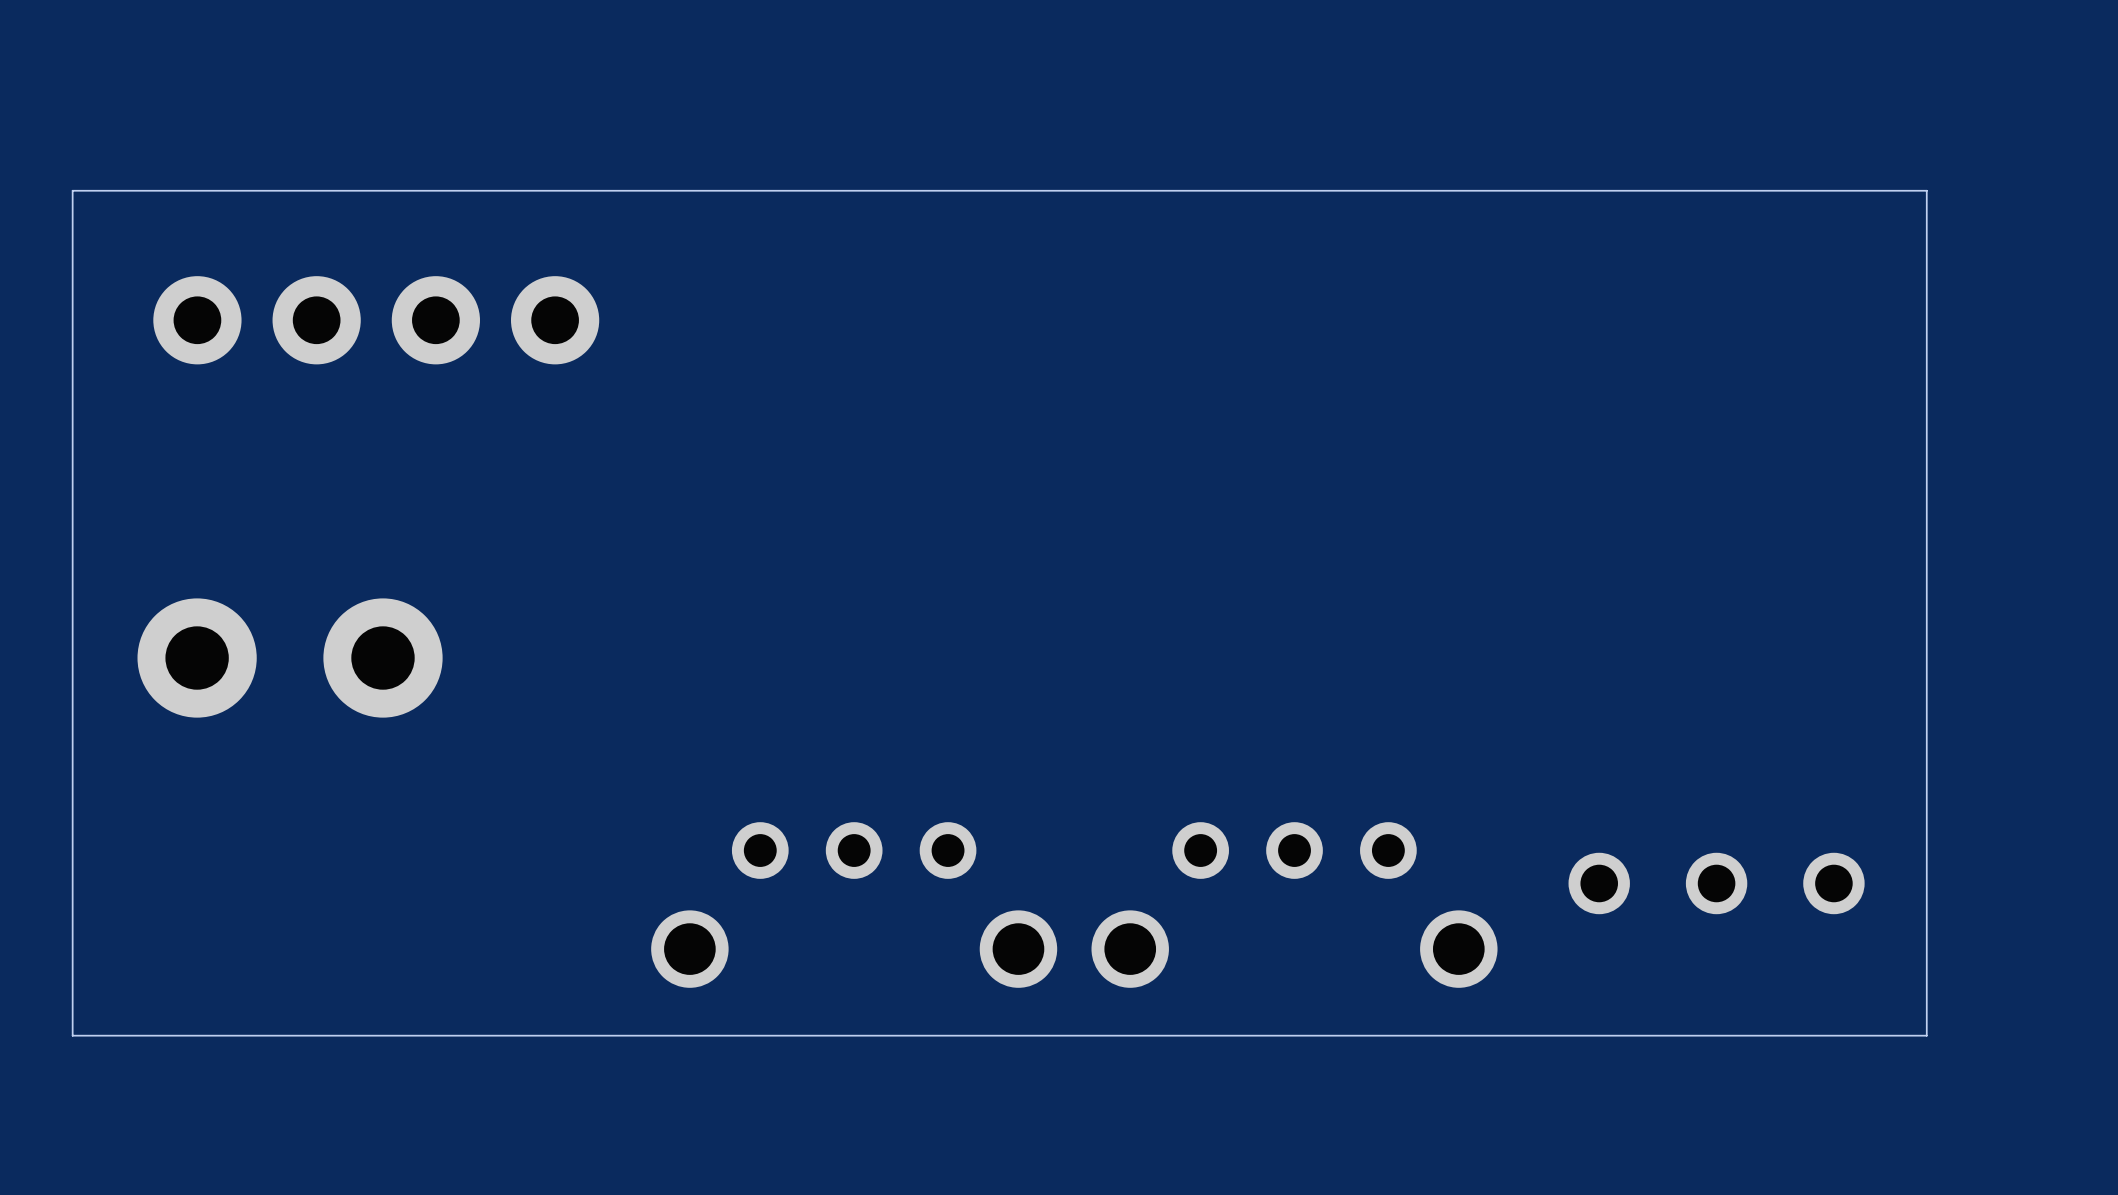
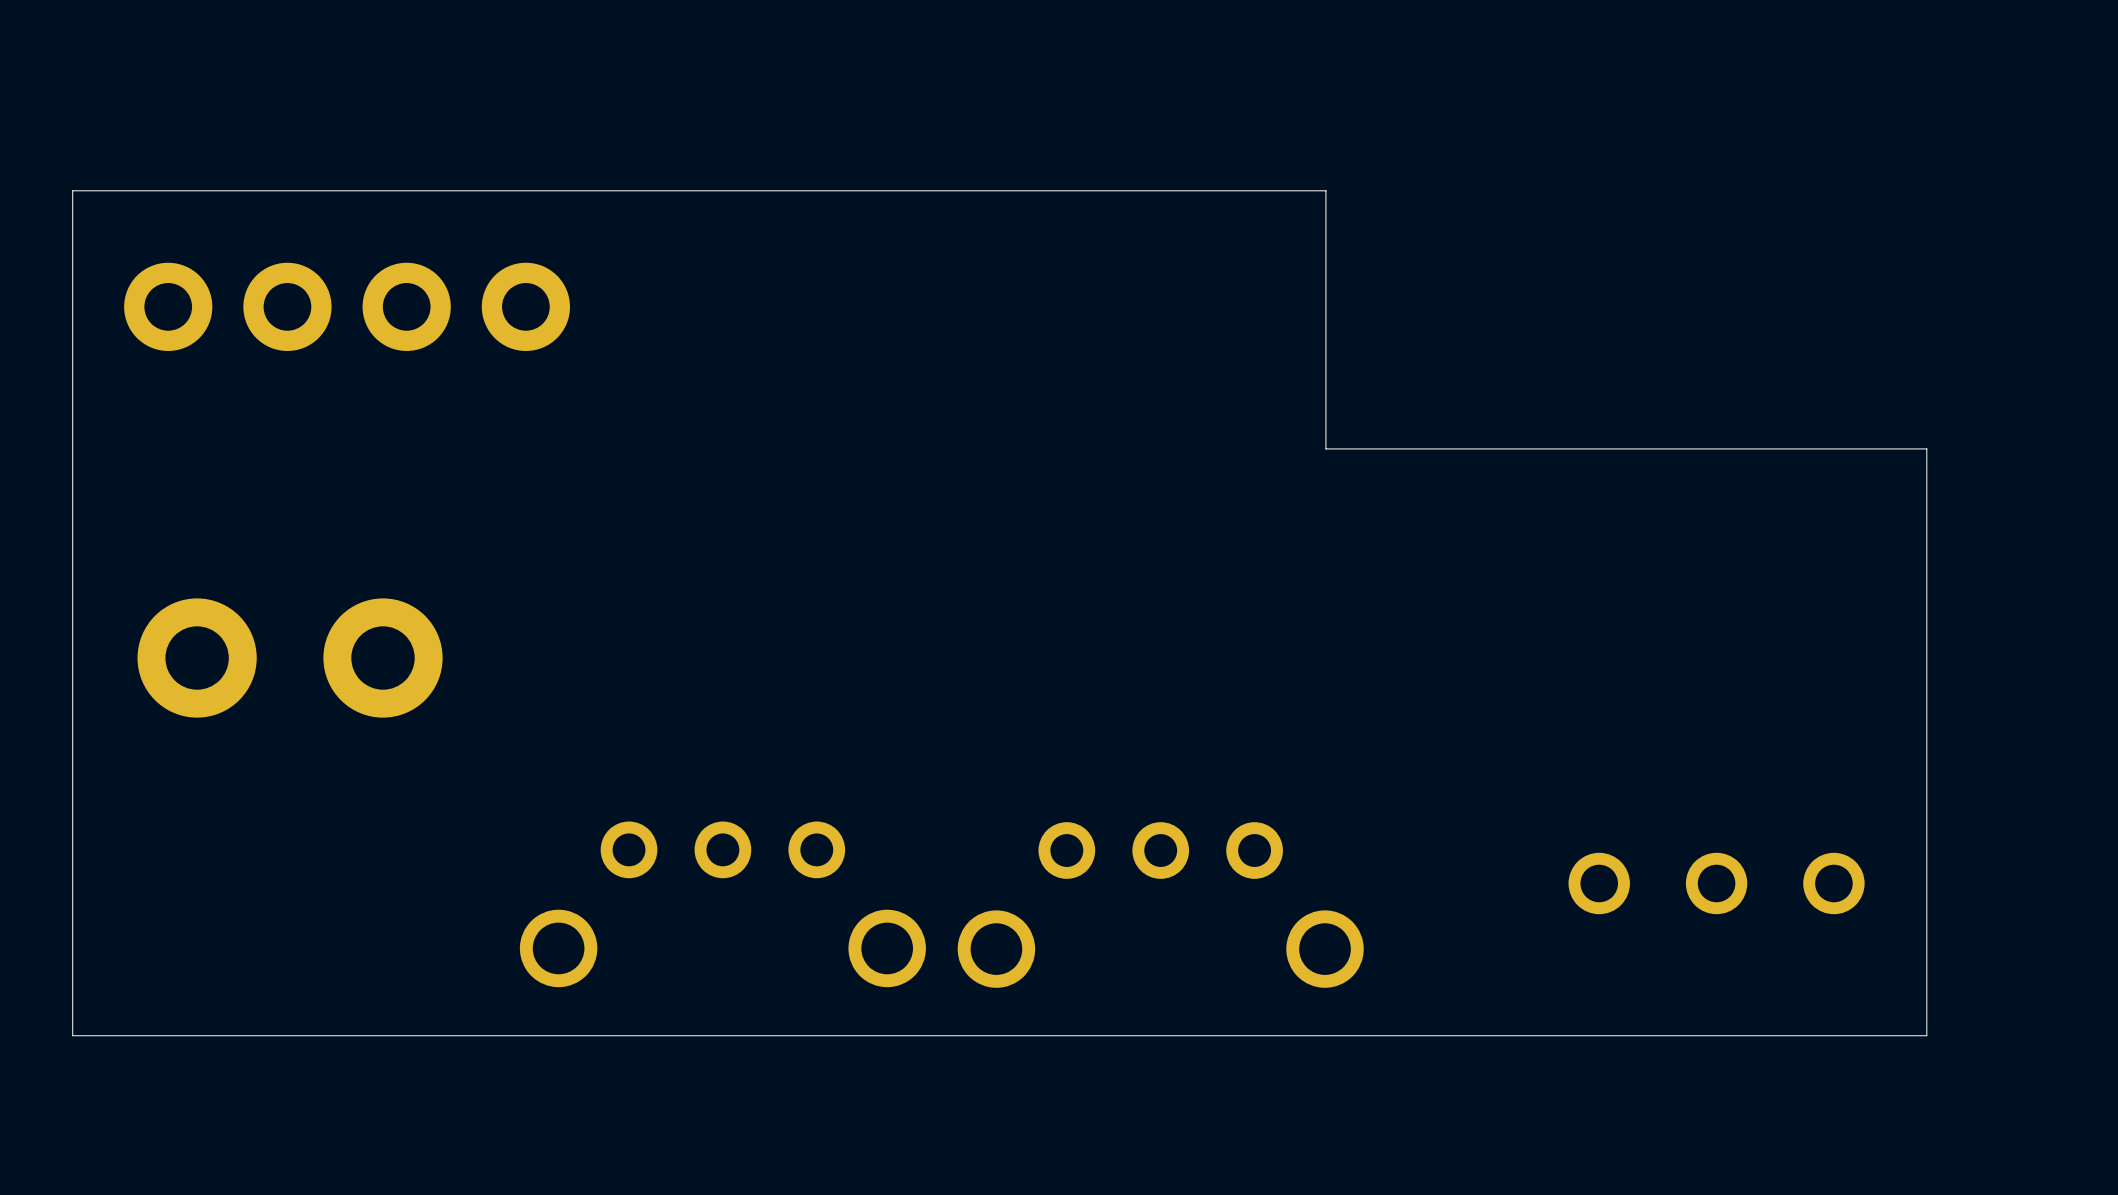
board edge: (1325, 190) (1926, 190) (1926, 448) -> (1325, 190) (1325, 448) (1926, 448)
part position: (376, 320) -> (347, 306)
part position: (854, 904) -> (722, 904)
part position: (1294, 904) -> (1160, 904)

